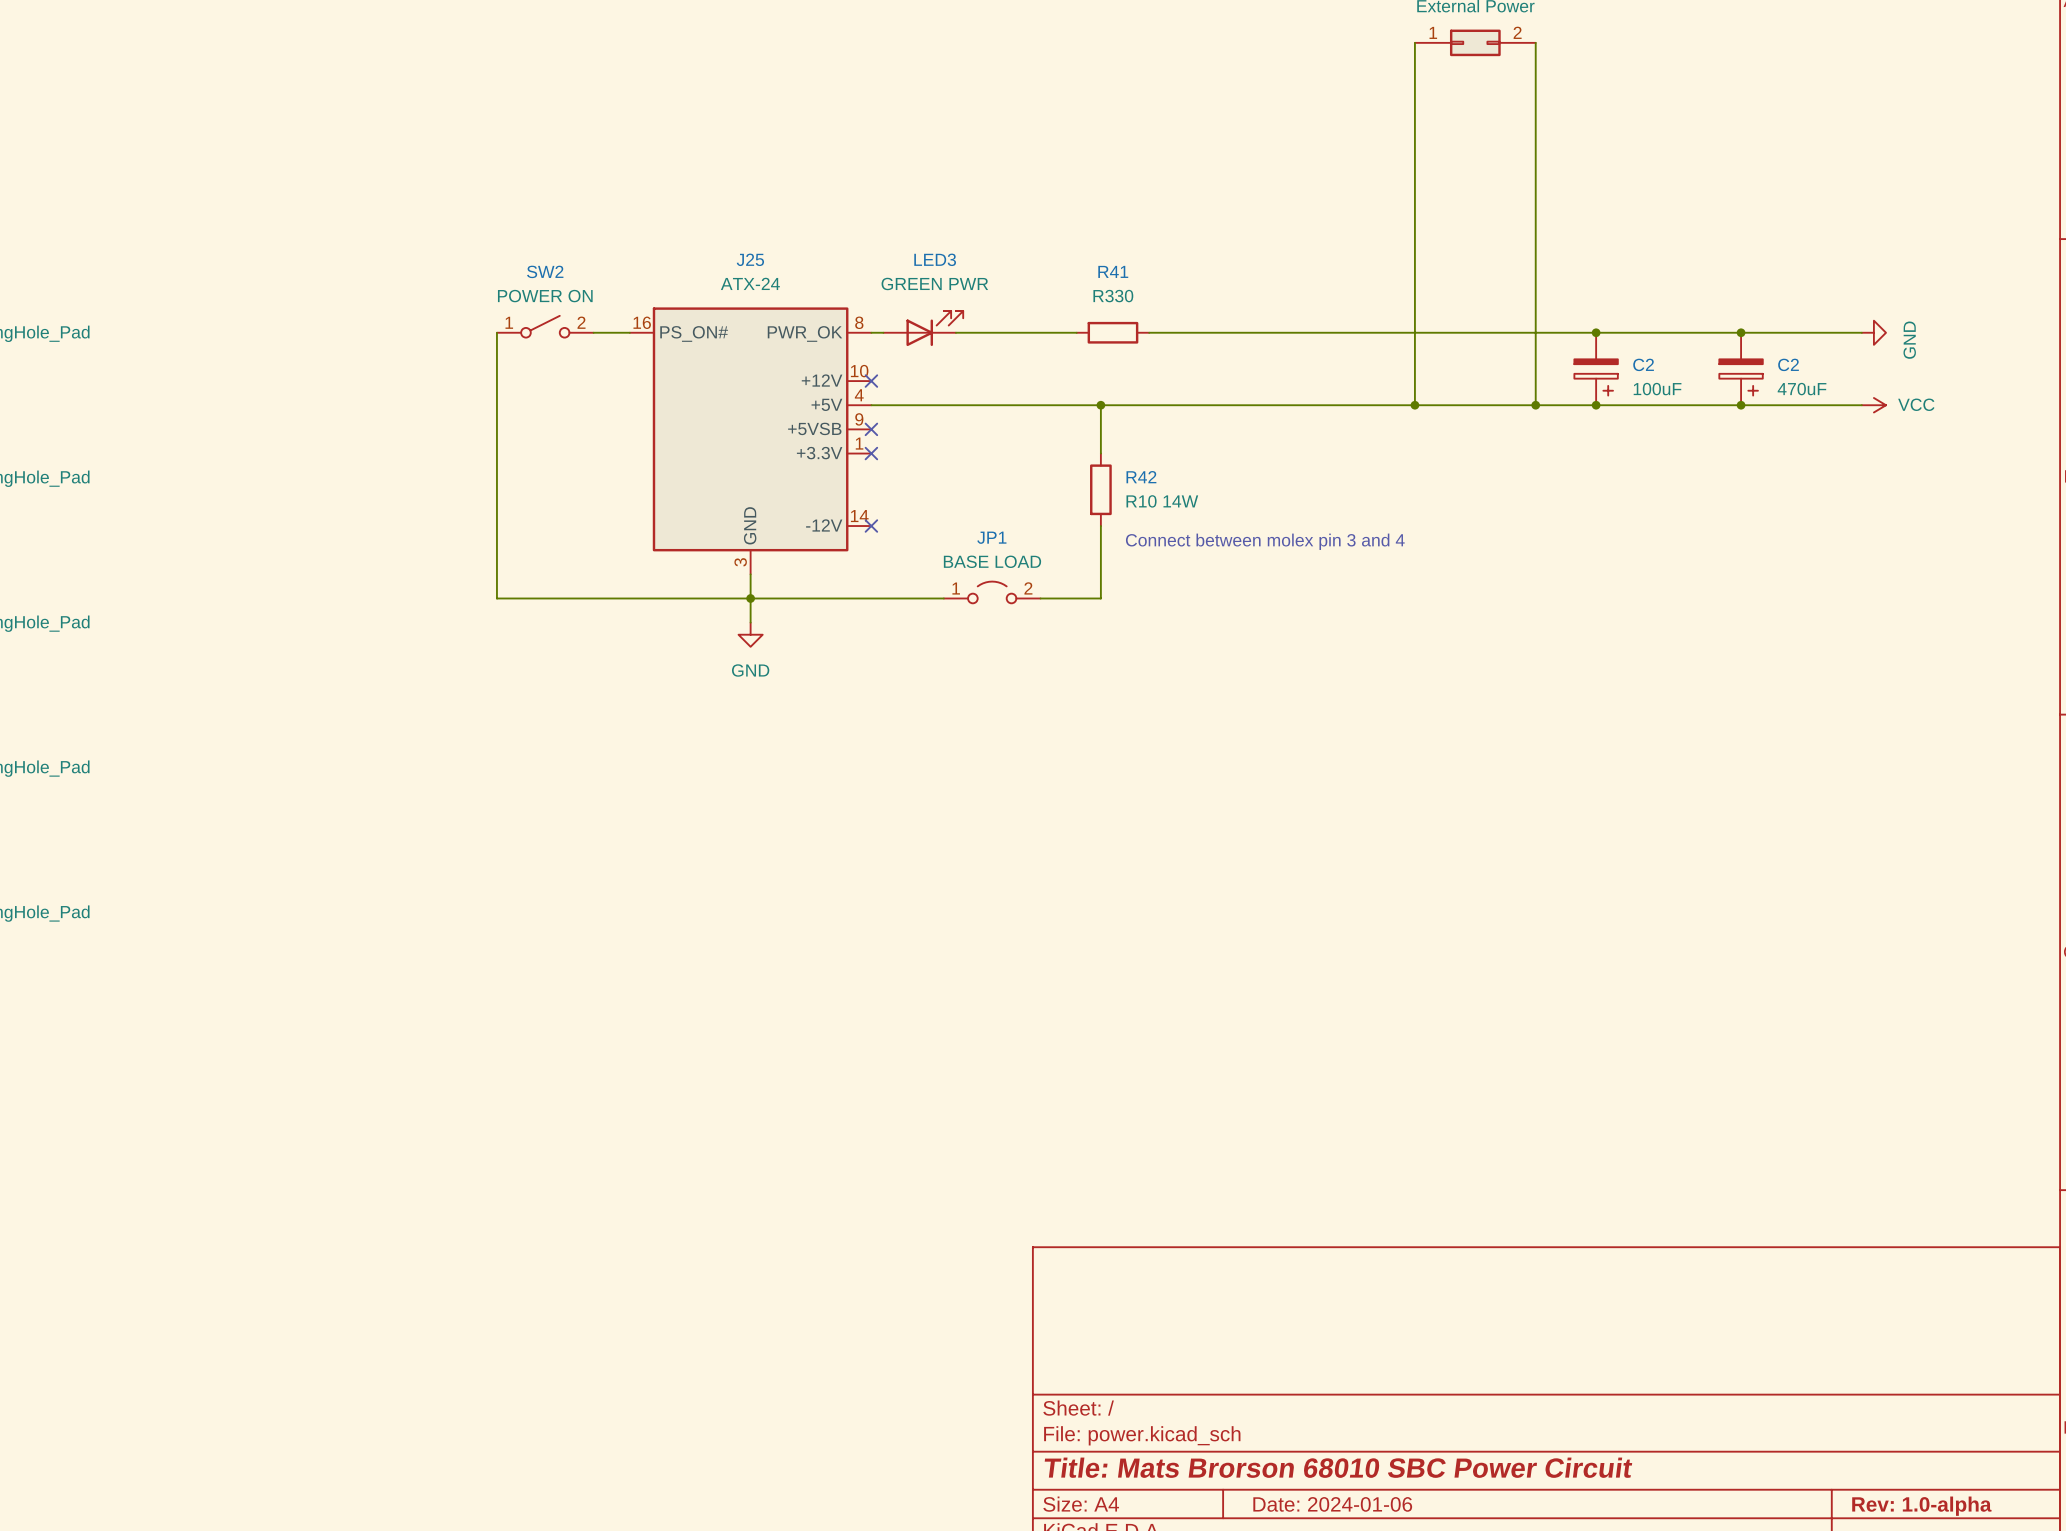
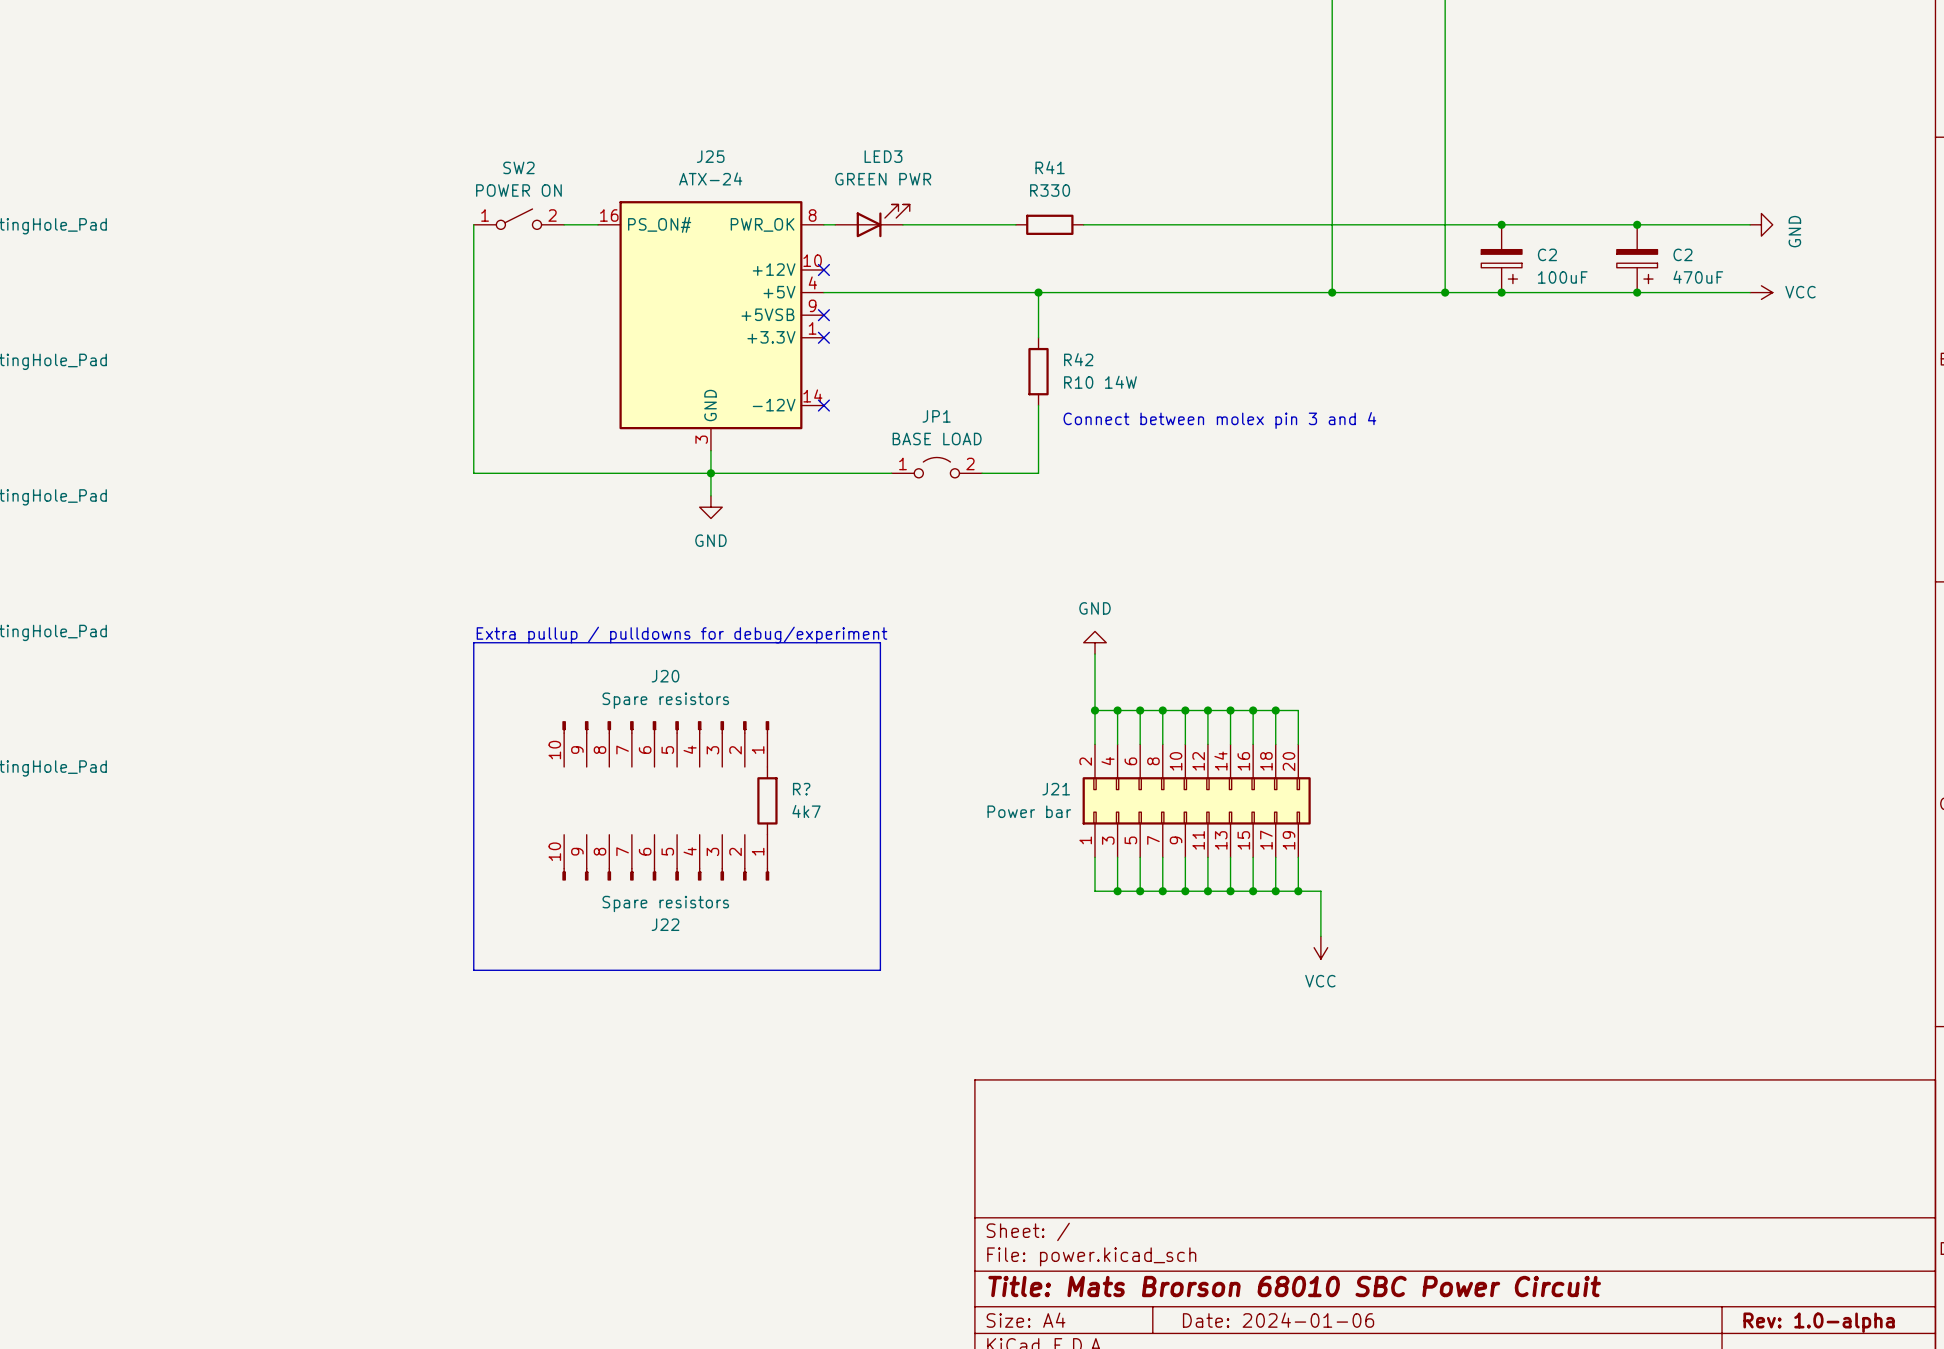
text: none -> Extra pullup / pulldowns for debug/experiment (682, 635)
line: none -> (473, 642) (880, 642) (880, 970) (473, 970) (473, 642)
power symbol: none -> GND (1095, 642)
wire: none -> (1095, 654) (1095, 744)
wire: none -> (1095, 710) (1298, 710) (1298, 744)
junction: none -> (1095, 710)
wire: none -> (1117, 710) (1117, 744)
junction: none -> (1117, 710)
wire: none -> (1140, 710) (1140, 744)
junction: none -> (1140, 710)
wire: none -> (1162, 710) (1162, 744)
junction: none -> (1162, 710)
wire: none -> (1185, 710) (1185, 744)
junction: none -> (1185, 710)
wire: none -> (1207, 710) (1207, 744)
junction: none -> (1207, 710)
wire: none -> (1230, 710) (1230, 744)
junction: none -> (1230, 710)
wire: none -> (1253, 710) (1253, 744)
junction: none -> (1253, 710)
wire: none -> (1275, 710) (1275, 744)
junction: none -> (1275, 710)
J20: none -> Spare resistors (665, 744)
R?: none -> 4k7 (767, 800)
J21: none -> Power bar (1196, 800)
J22: none -> Spare resistors (665, 857)
wire: none -> (1095, 857) (1095, 891) (1320, 891) (1320, 936)
wire: none -> (1117, 857) (1117, 891)
wire: none -> (1140, 857) (1140, 891)
wire: none -> (1162, 857) (1162, 891)
wire: none -> (1185, 857) (1185, 891)
wire: none -> (1207, 857) (1207, 891)
wire: none -> (1230, 857) (1230, 891)
wire: none -> (1253, 857) (1253, 891)
wire: none -> (1275, 857) (1275, 891)
wire: none -> (1298, 857) (1298, 891)
junction: none -> (1117, 891)
junction: none -> (1140, 891)
junction: none -> (1162, 891)
junction: none -> (1185, 891)
junction: none -> (1207, 891)
junction: none -> (1230, 891)
junction: none -> (1253, 891)
junction: none -> (1275, 891)
junction: none -> (1298, 891)
power symbol: none -> VCC (1320, 947)

